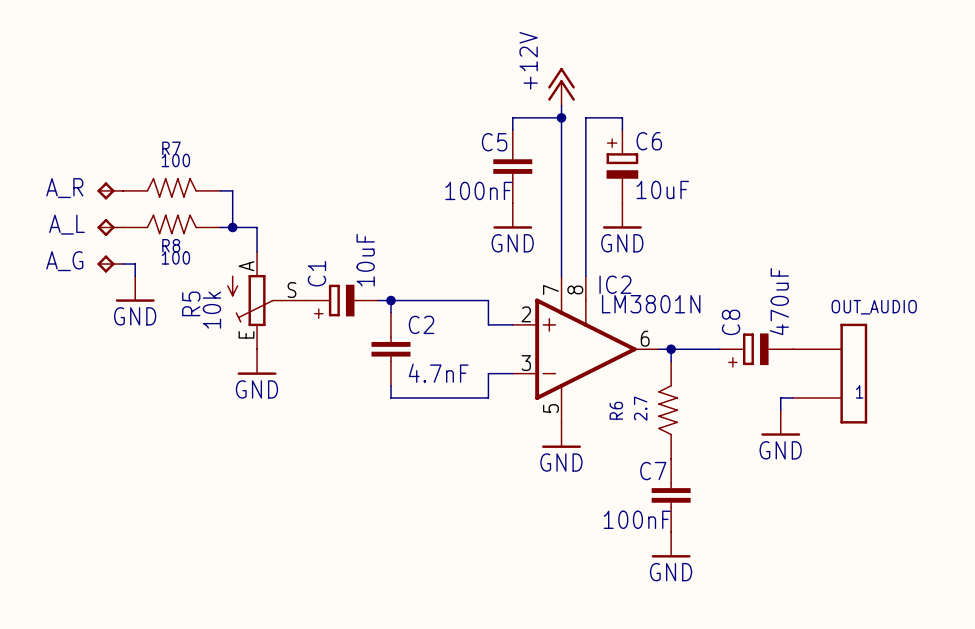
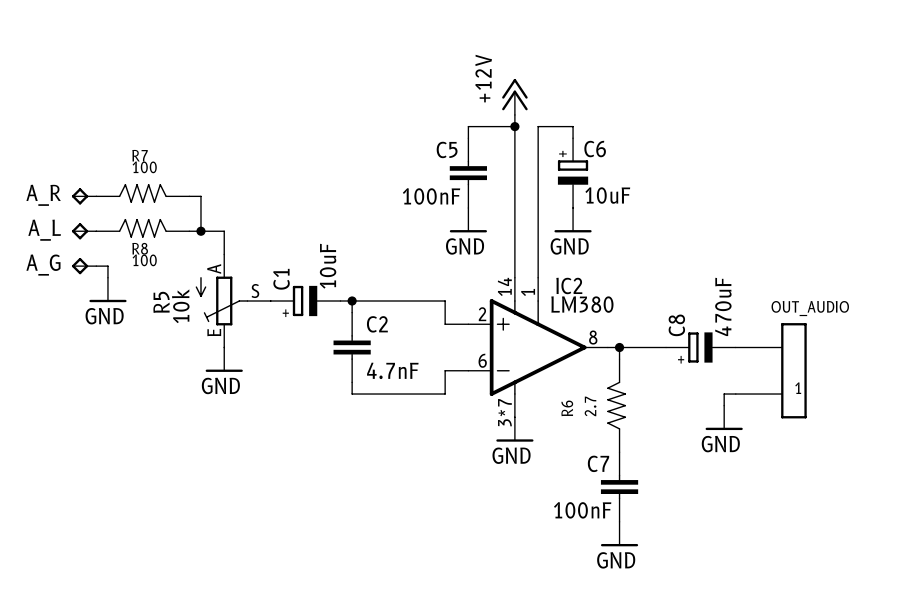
IC2 pin number: 7 (550, 289) -> 14 (504, 286)
IC2 pin number: 8 (575, 289) -> 1 (528, 292)
IC2 value: LM3801N (651, 304) -> LM380 (582, 304)
IC2 pin number: 6 (645, 338) -> 8 (593, 337)
IC2 pin number: 3 (526, 363) -> 6 (482, 360)
IC2 pin number: 5 (550, 408) -> 3*7 (504, 412)

